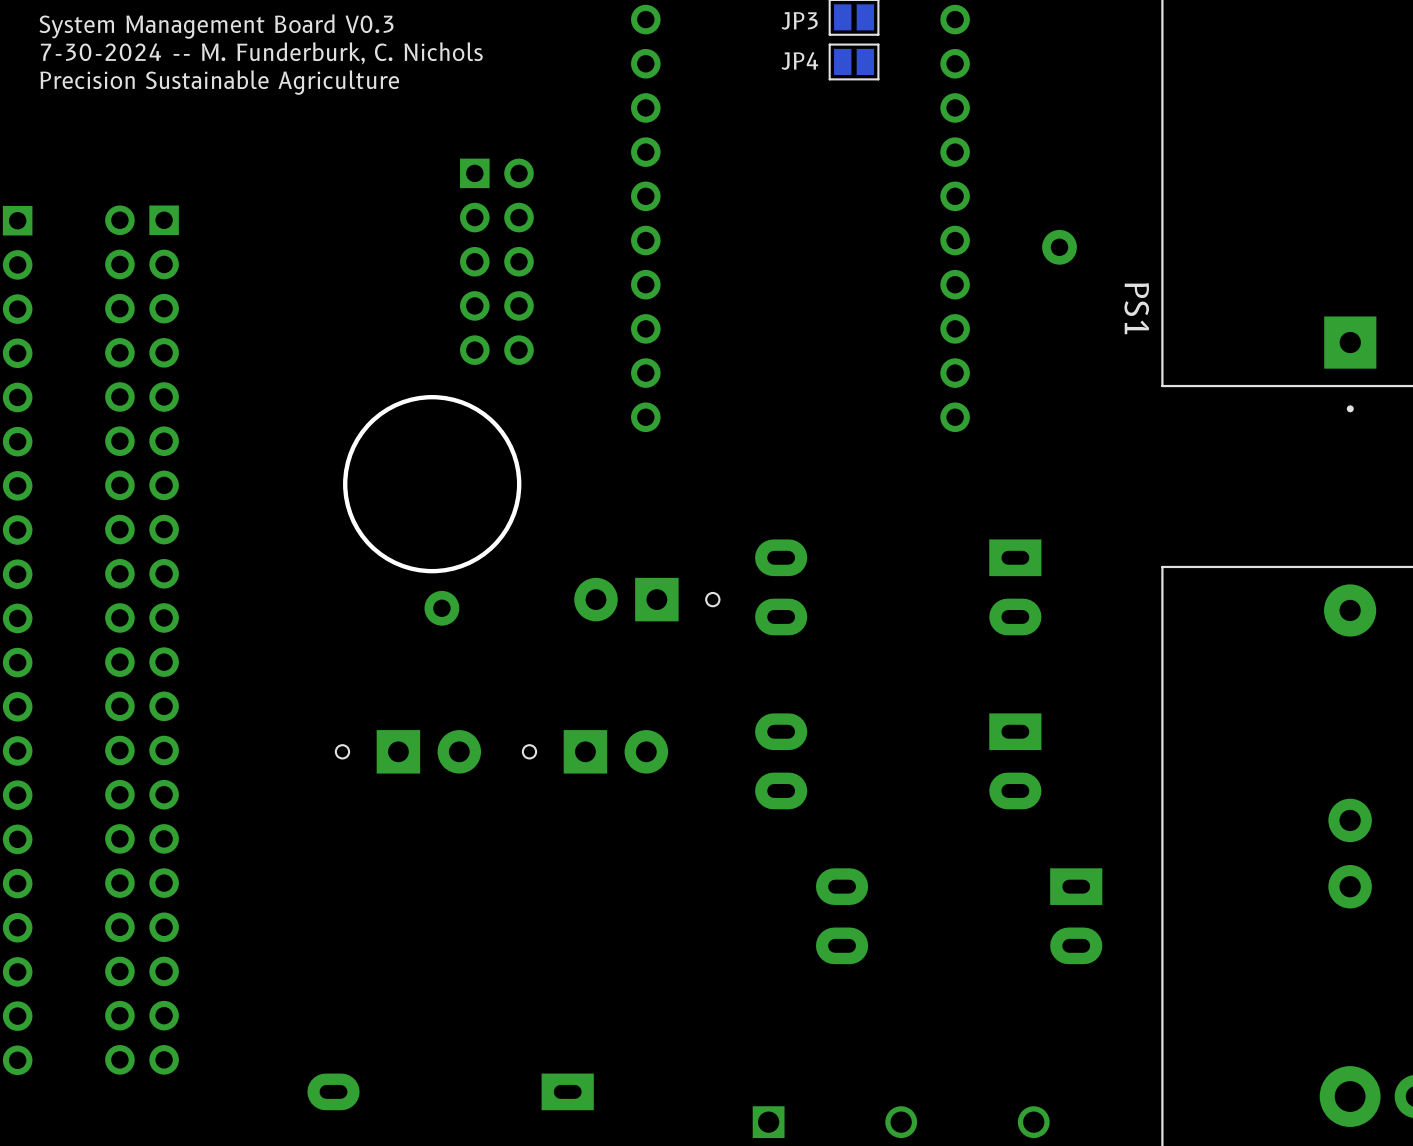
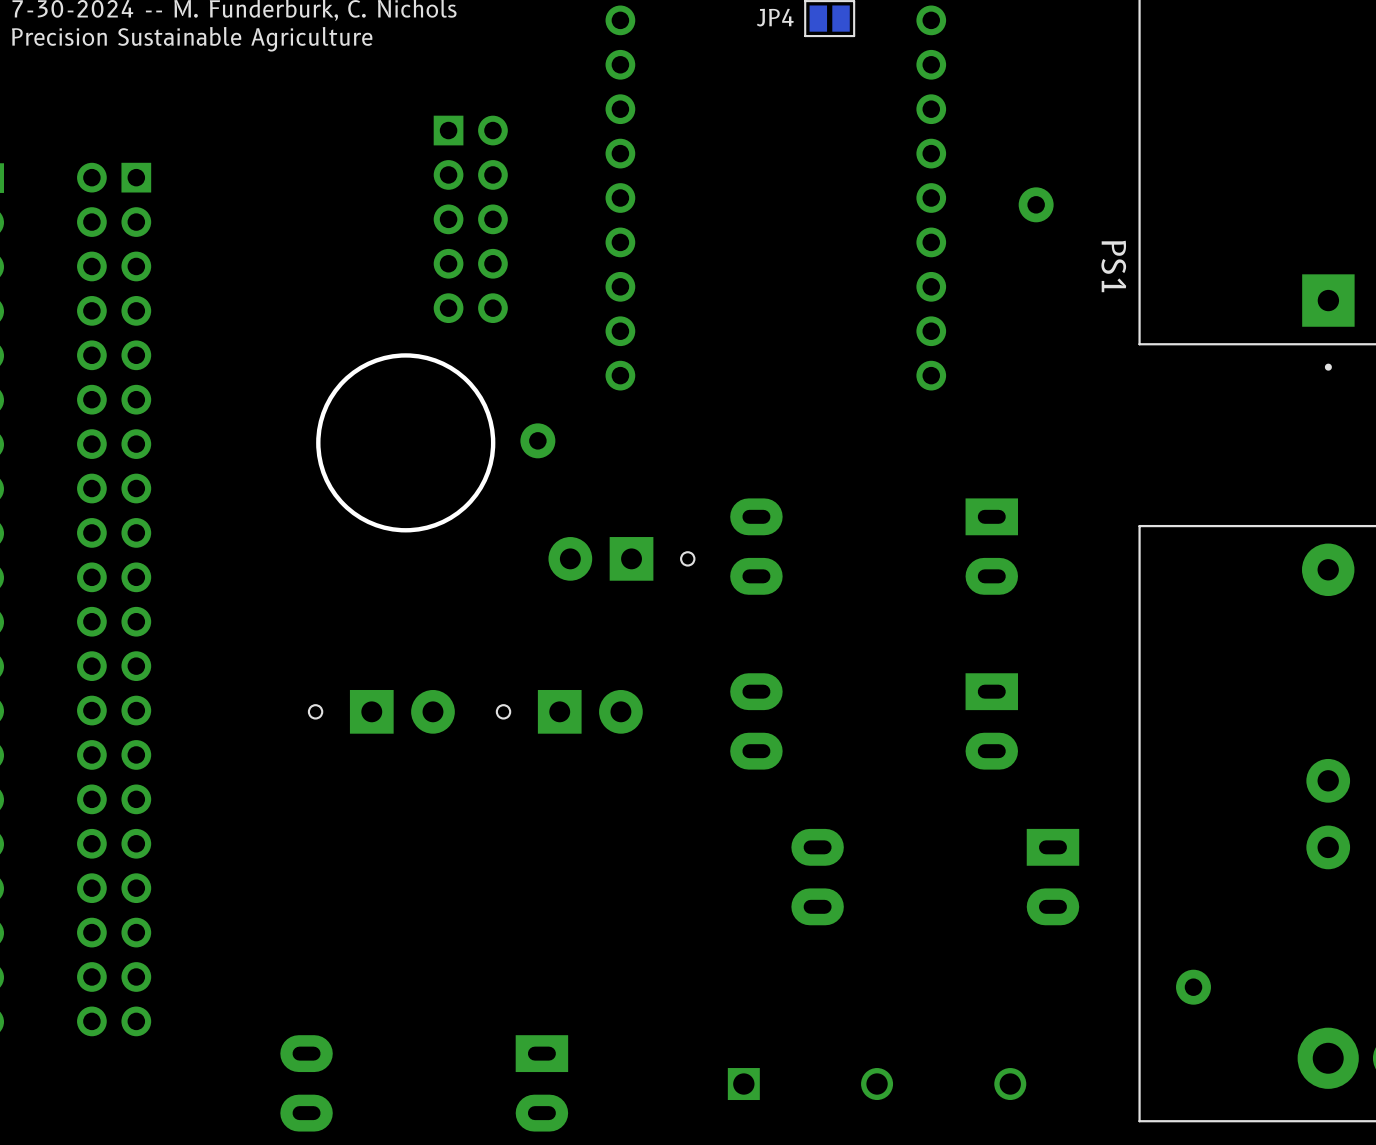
part position: (441, 608) -> (537, 440)
part: none -> (1193, 987)

